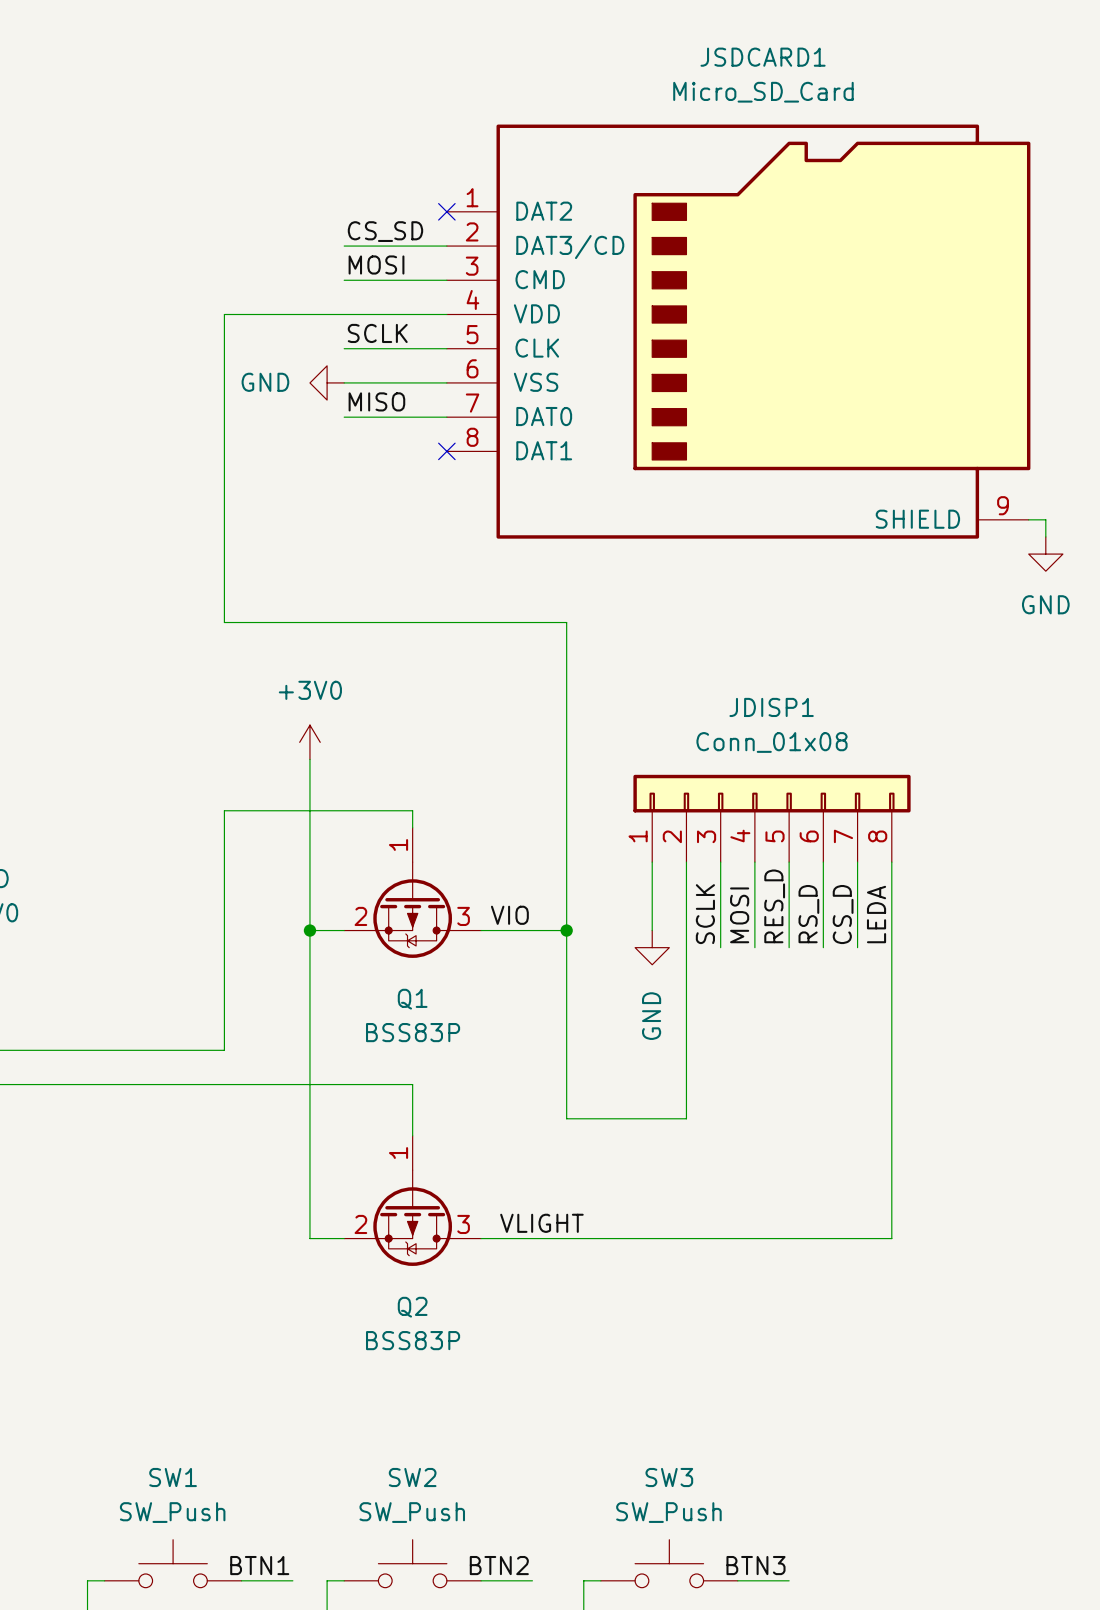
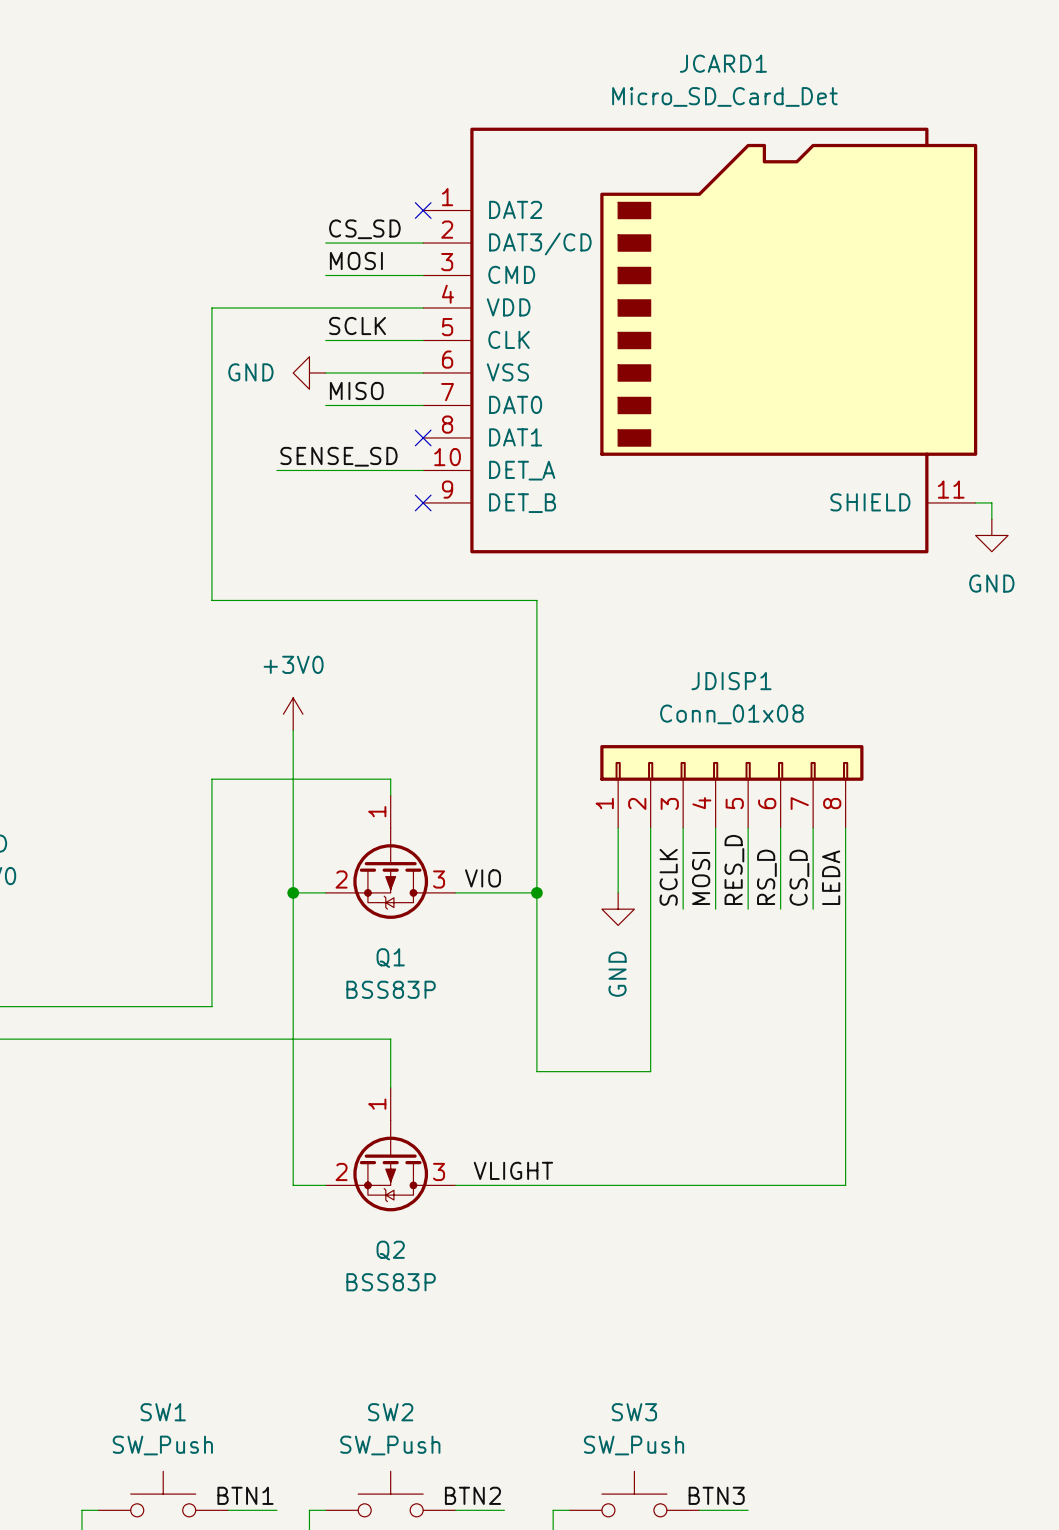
JSDCARD1: Micro_SD_Card (738, 331) -> none
JCARD1: none -> Micro_SD_Card_Det (700, 340)
label: none -> SENSE_SD (338, 456)
wire: none -> (276, 470) (423, 470)
no-connect mark: none -> (423, 502)

